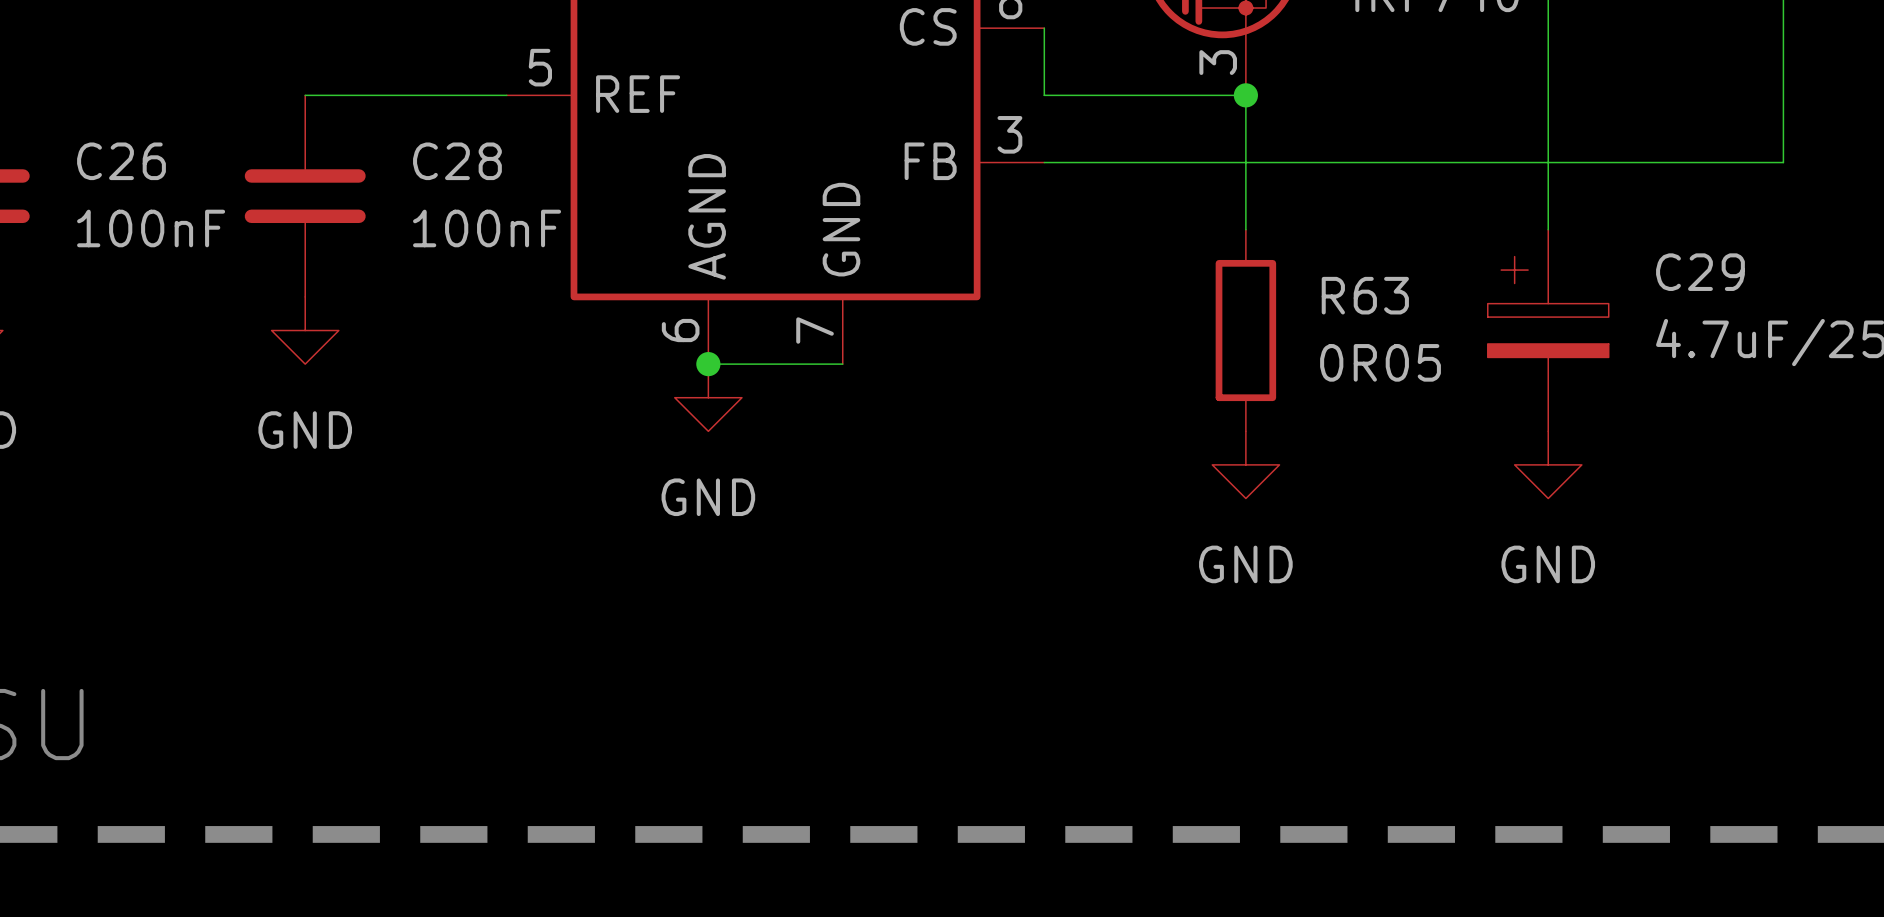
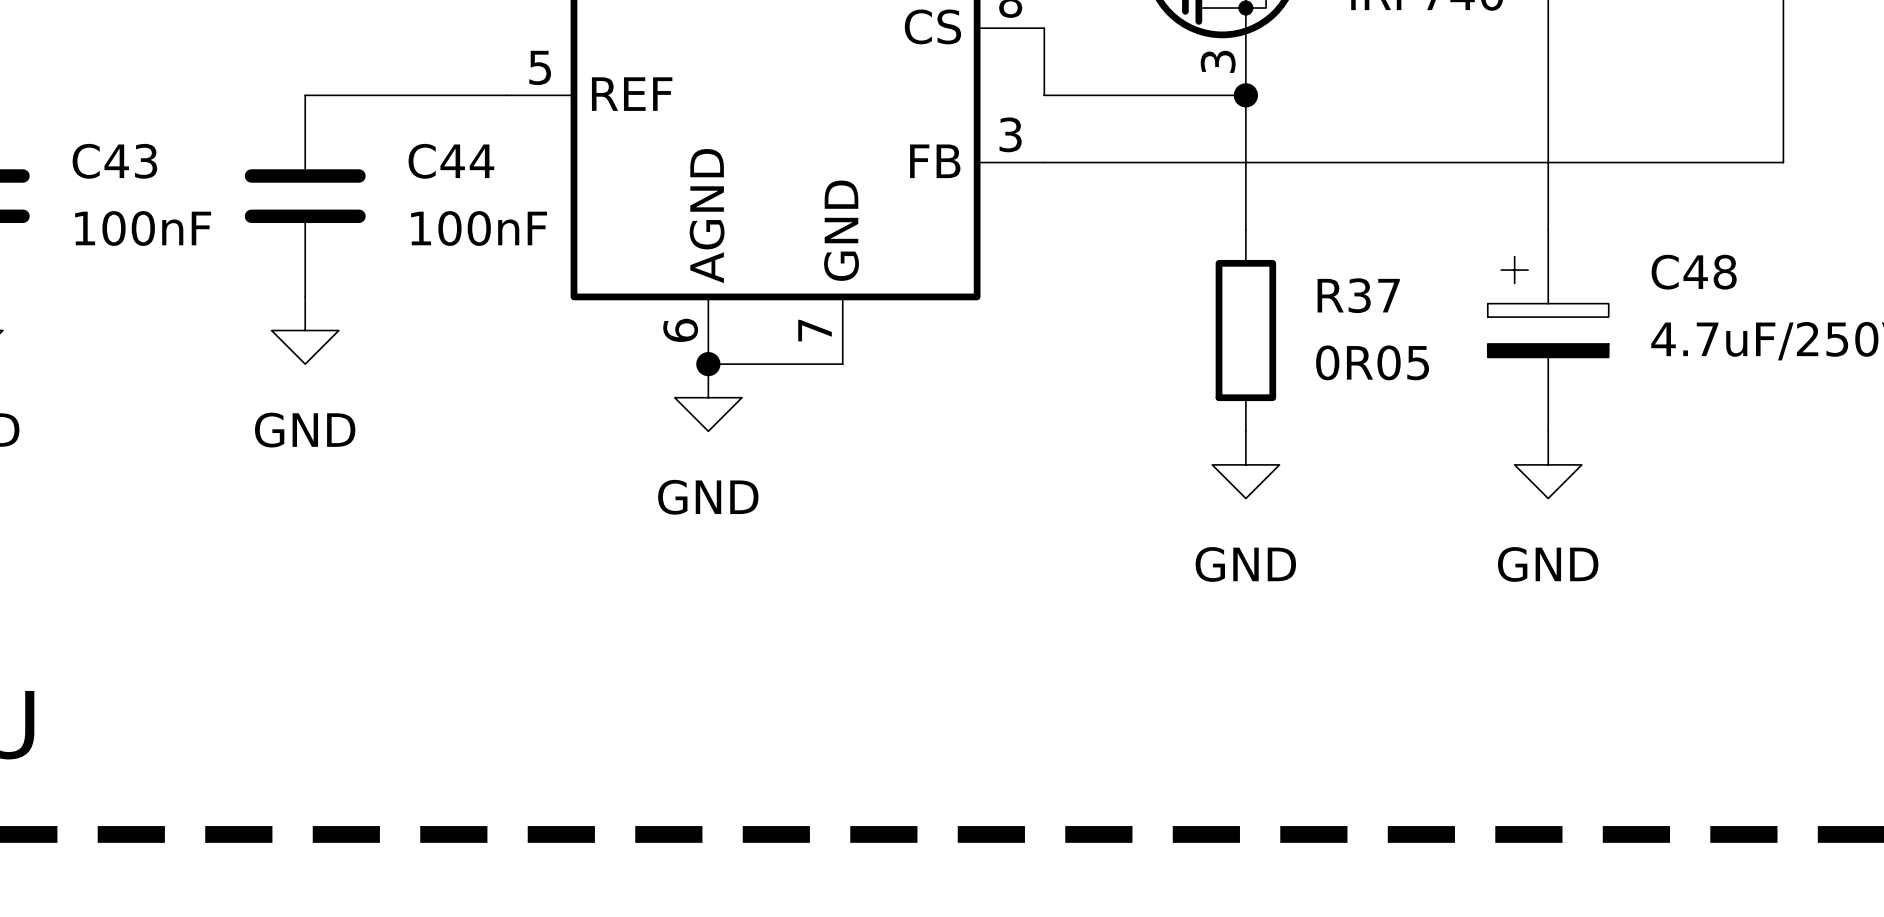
C26 name: C26 (121, 161) -> C43 (114, 161)
C28 name: C28 (457, 161) -> C44 (451, 161)
C29 name: C29 (1700, 272) -> C48 (1694, 272)
R63 name: R63 (1365, 295) -> R37 (1358, 295)

